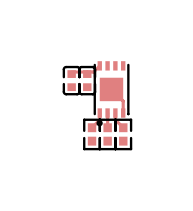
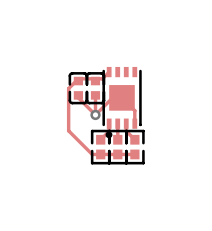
track: none -> (78, 78) (68, 88) (68, 130) (92, 154) (134, 154)
track: none -> (78, 97) (95, 114)
track: none -> (95, 97) (95, 114)
track: none -> (112, 97) (95, 114)
via: none -> (95, 114)

